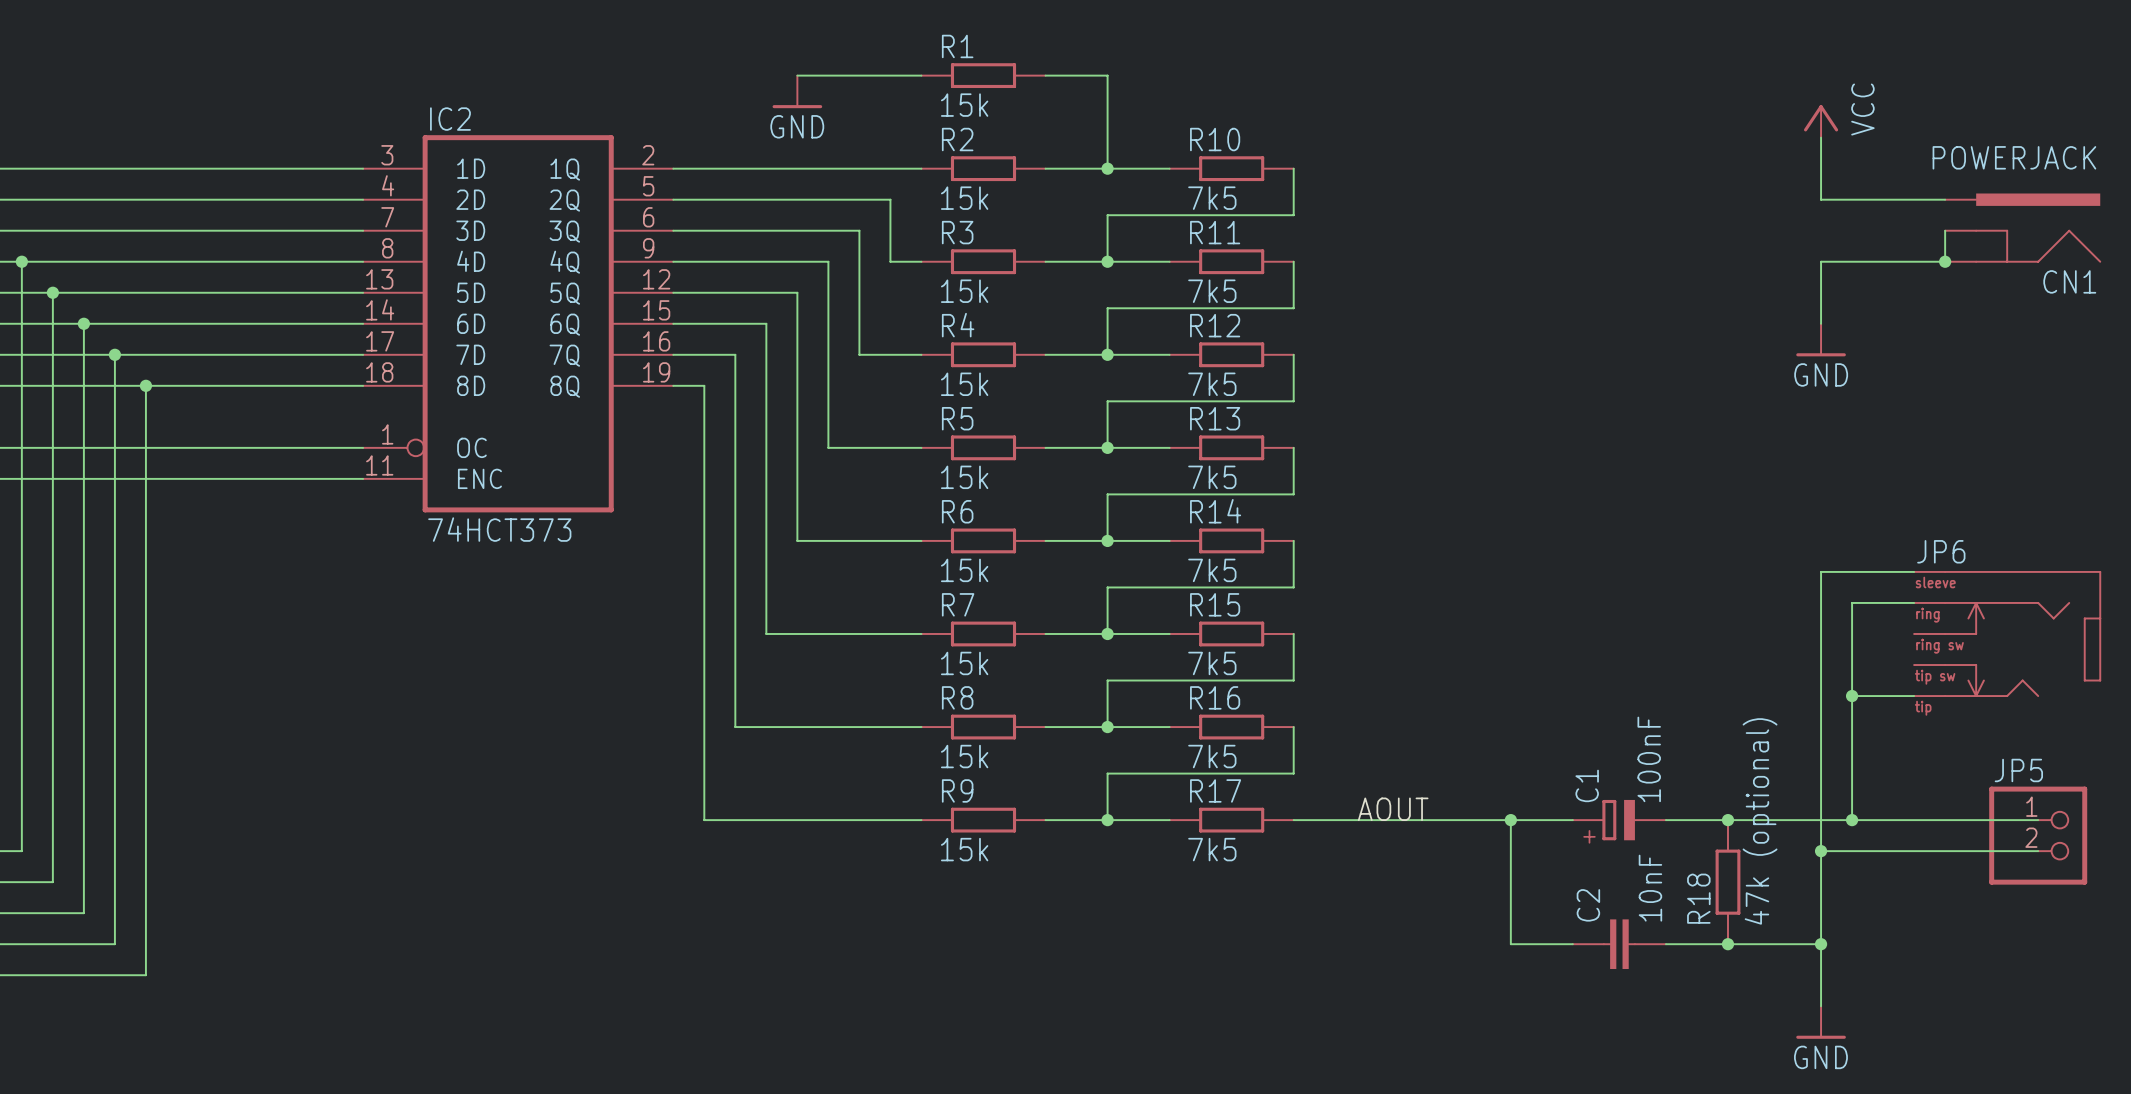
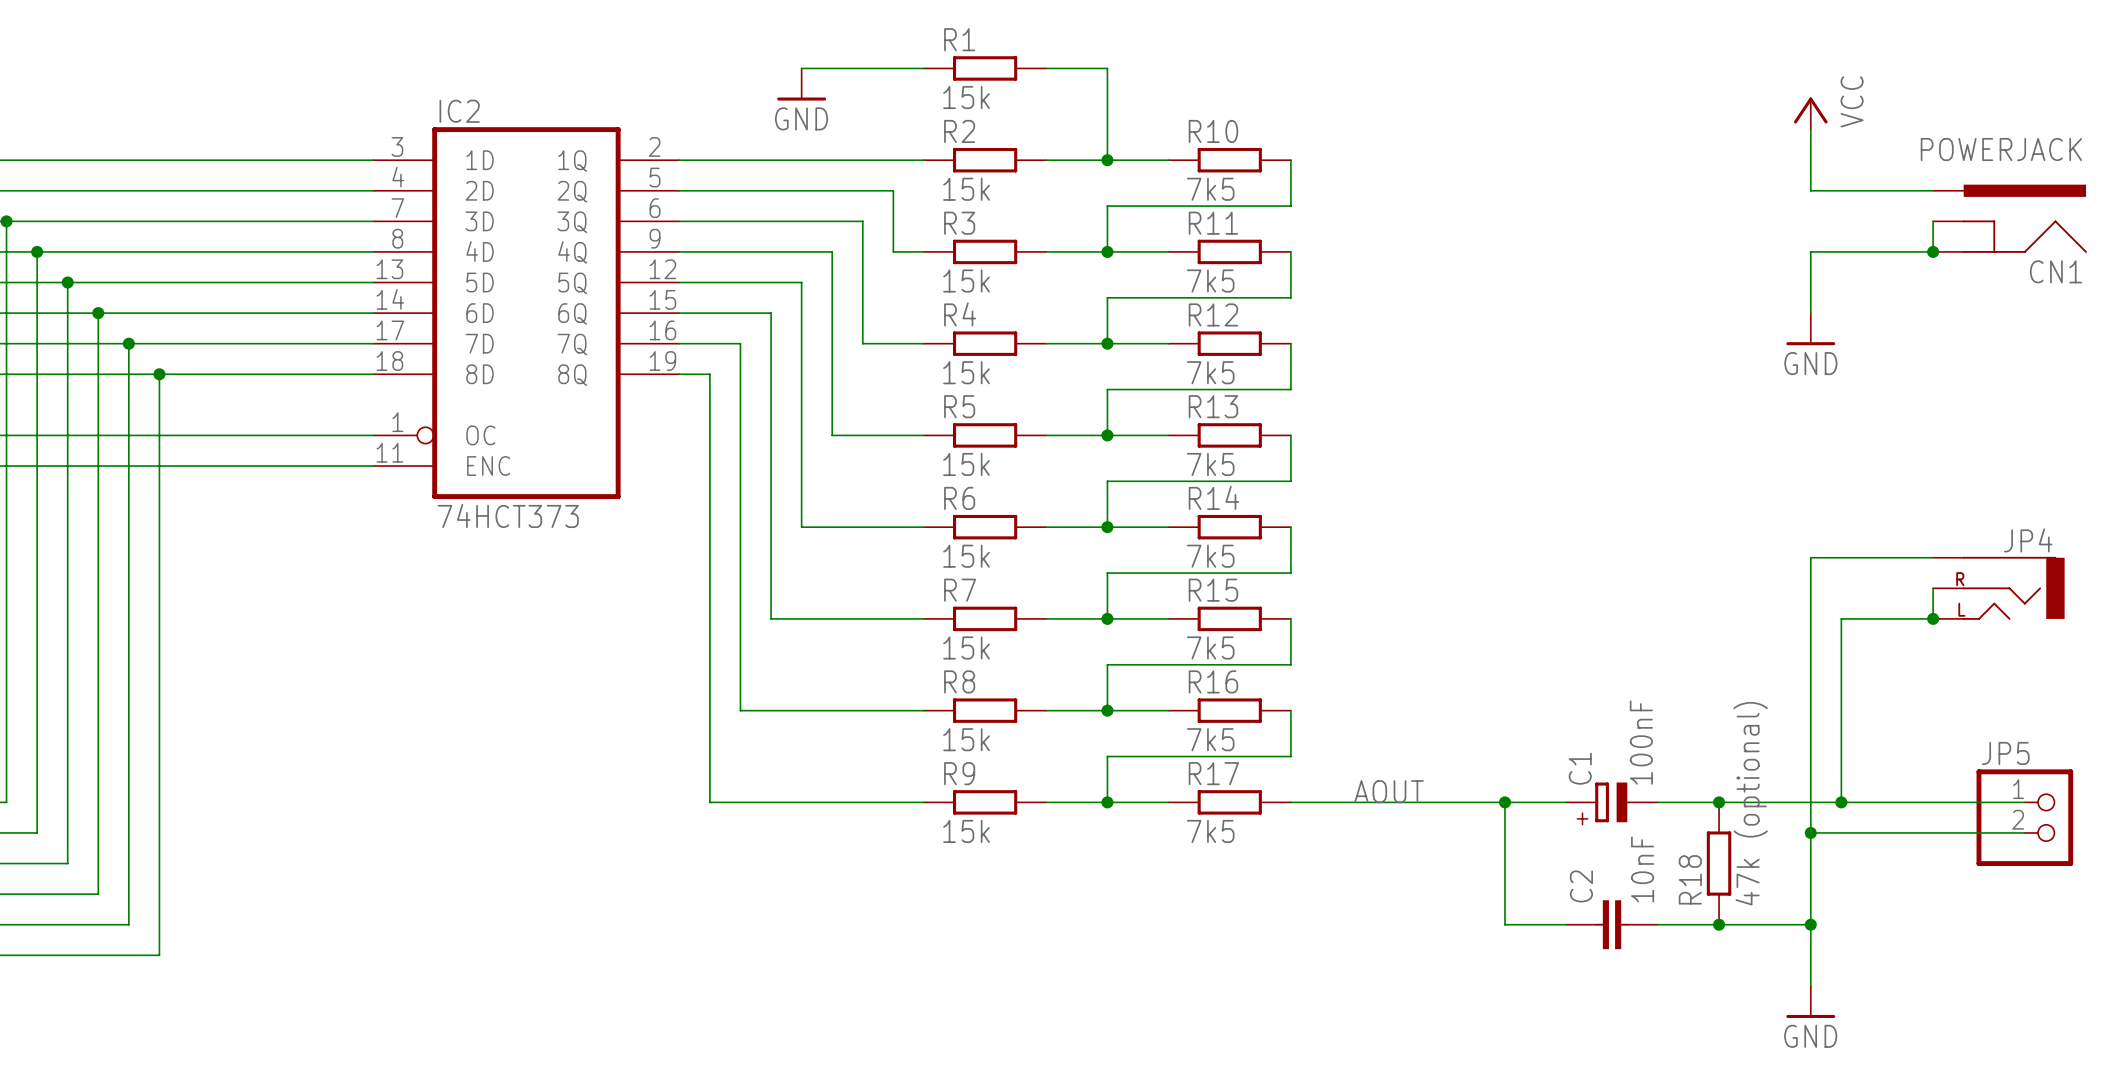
wire: (1914, 602) (1852, 602) (1852, 633) -> (1933, 588) (1933, 618) (1841, 618)
JP4: none -> (1998, 588)
junction: none -> (1933, 618)
JP6: (2007, 633) -> none
wire: (1852, 696) (1914, 696) -> none
junction: (1852, 696) -> none

